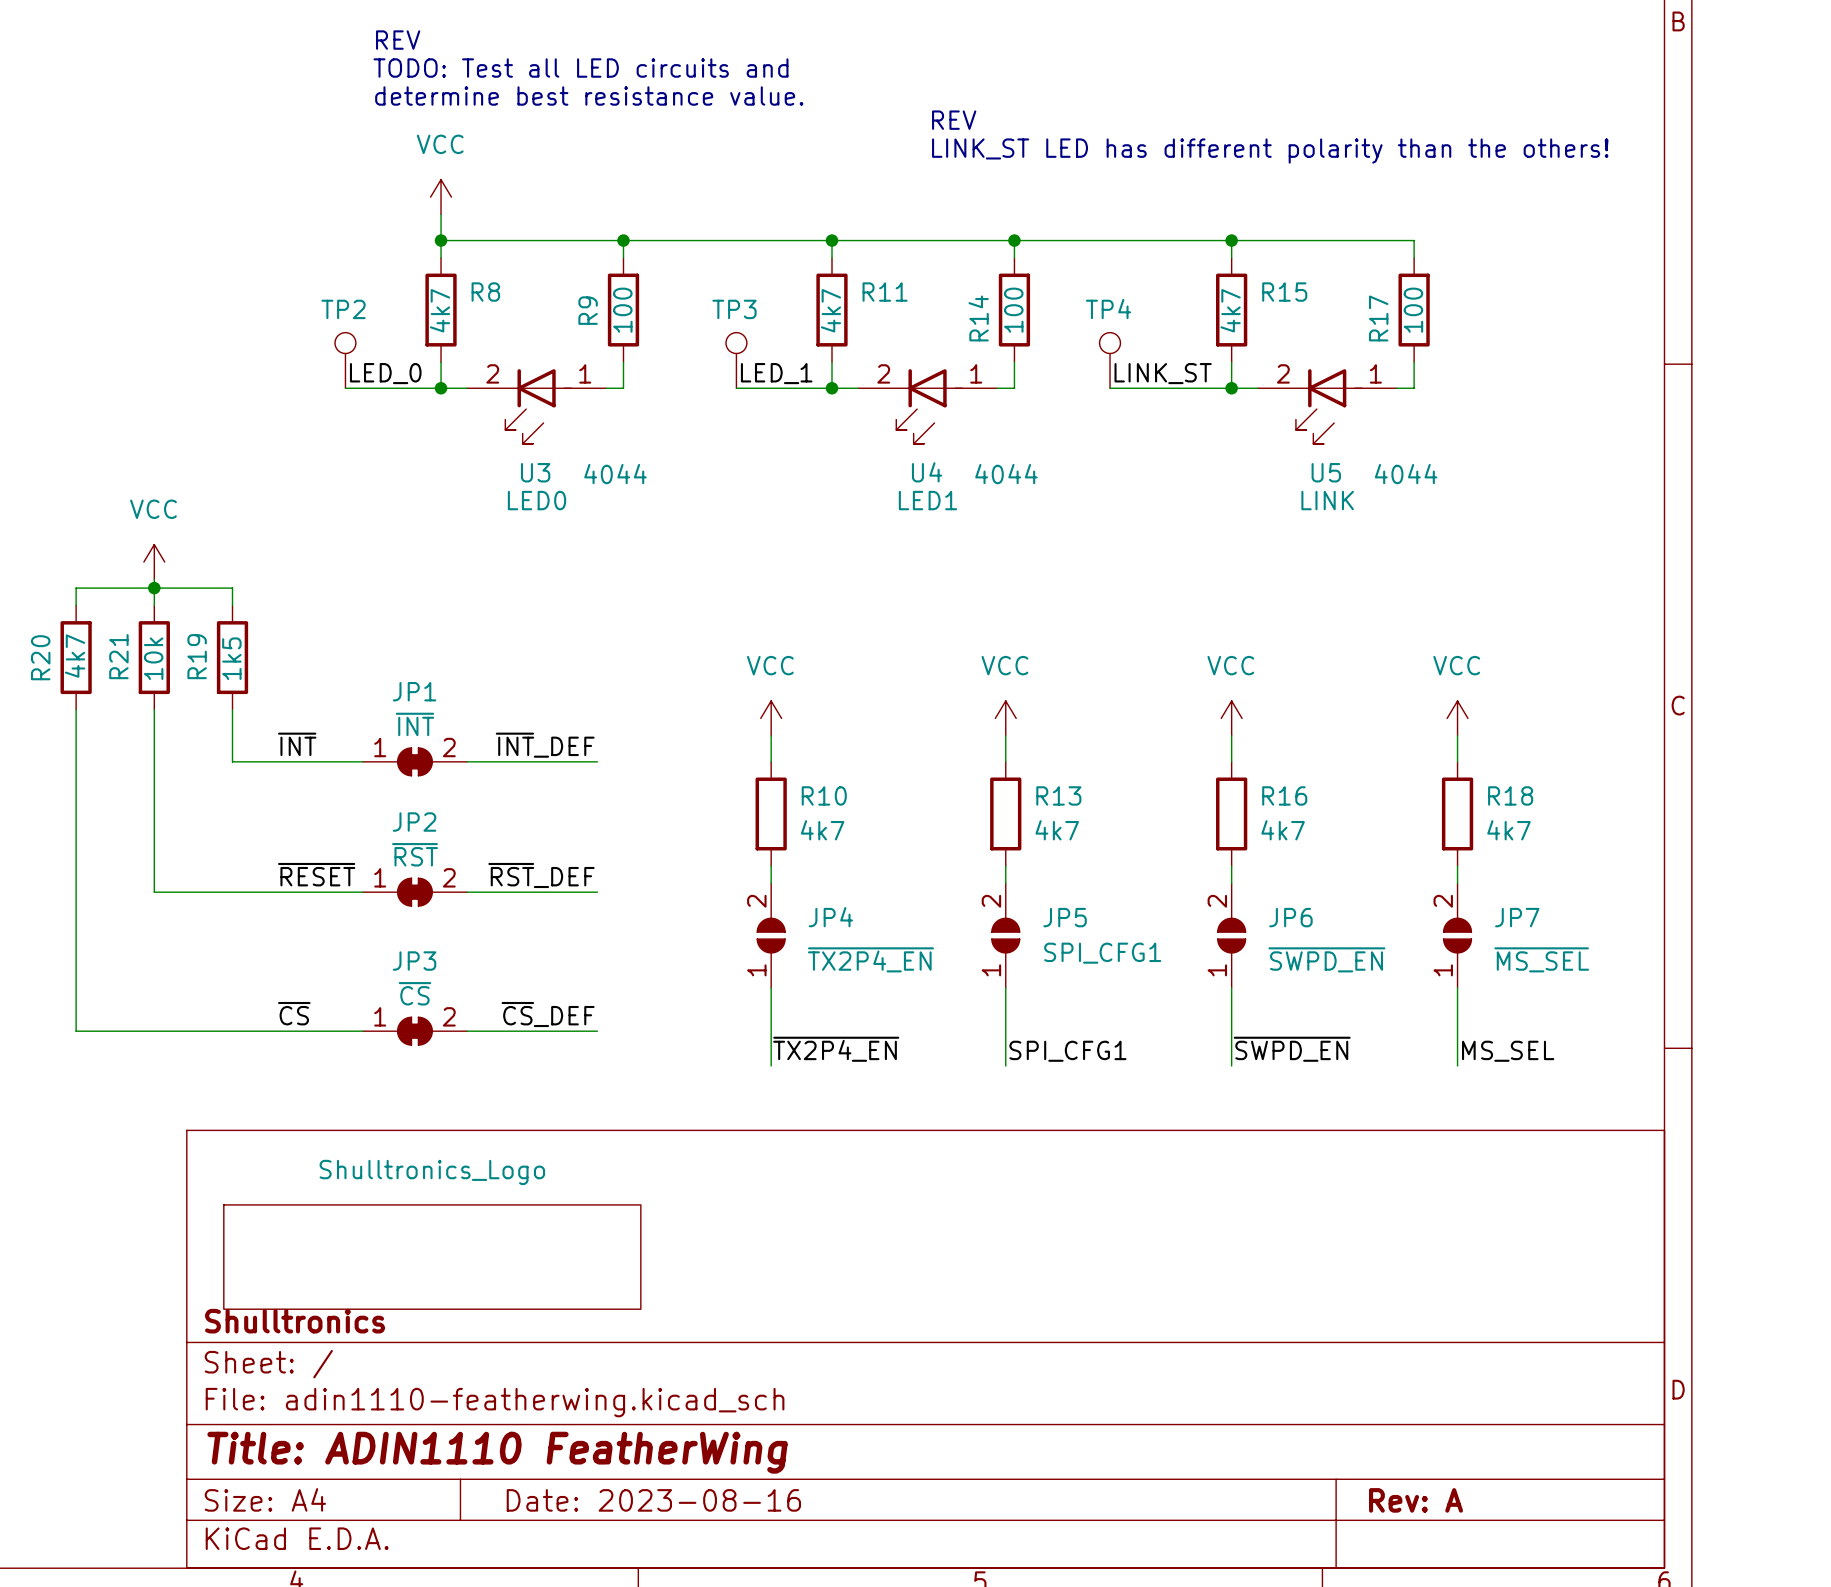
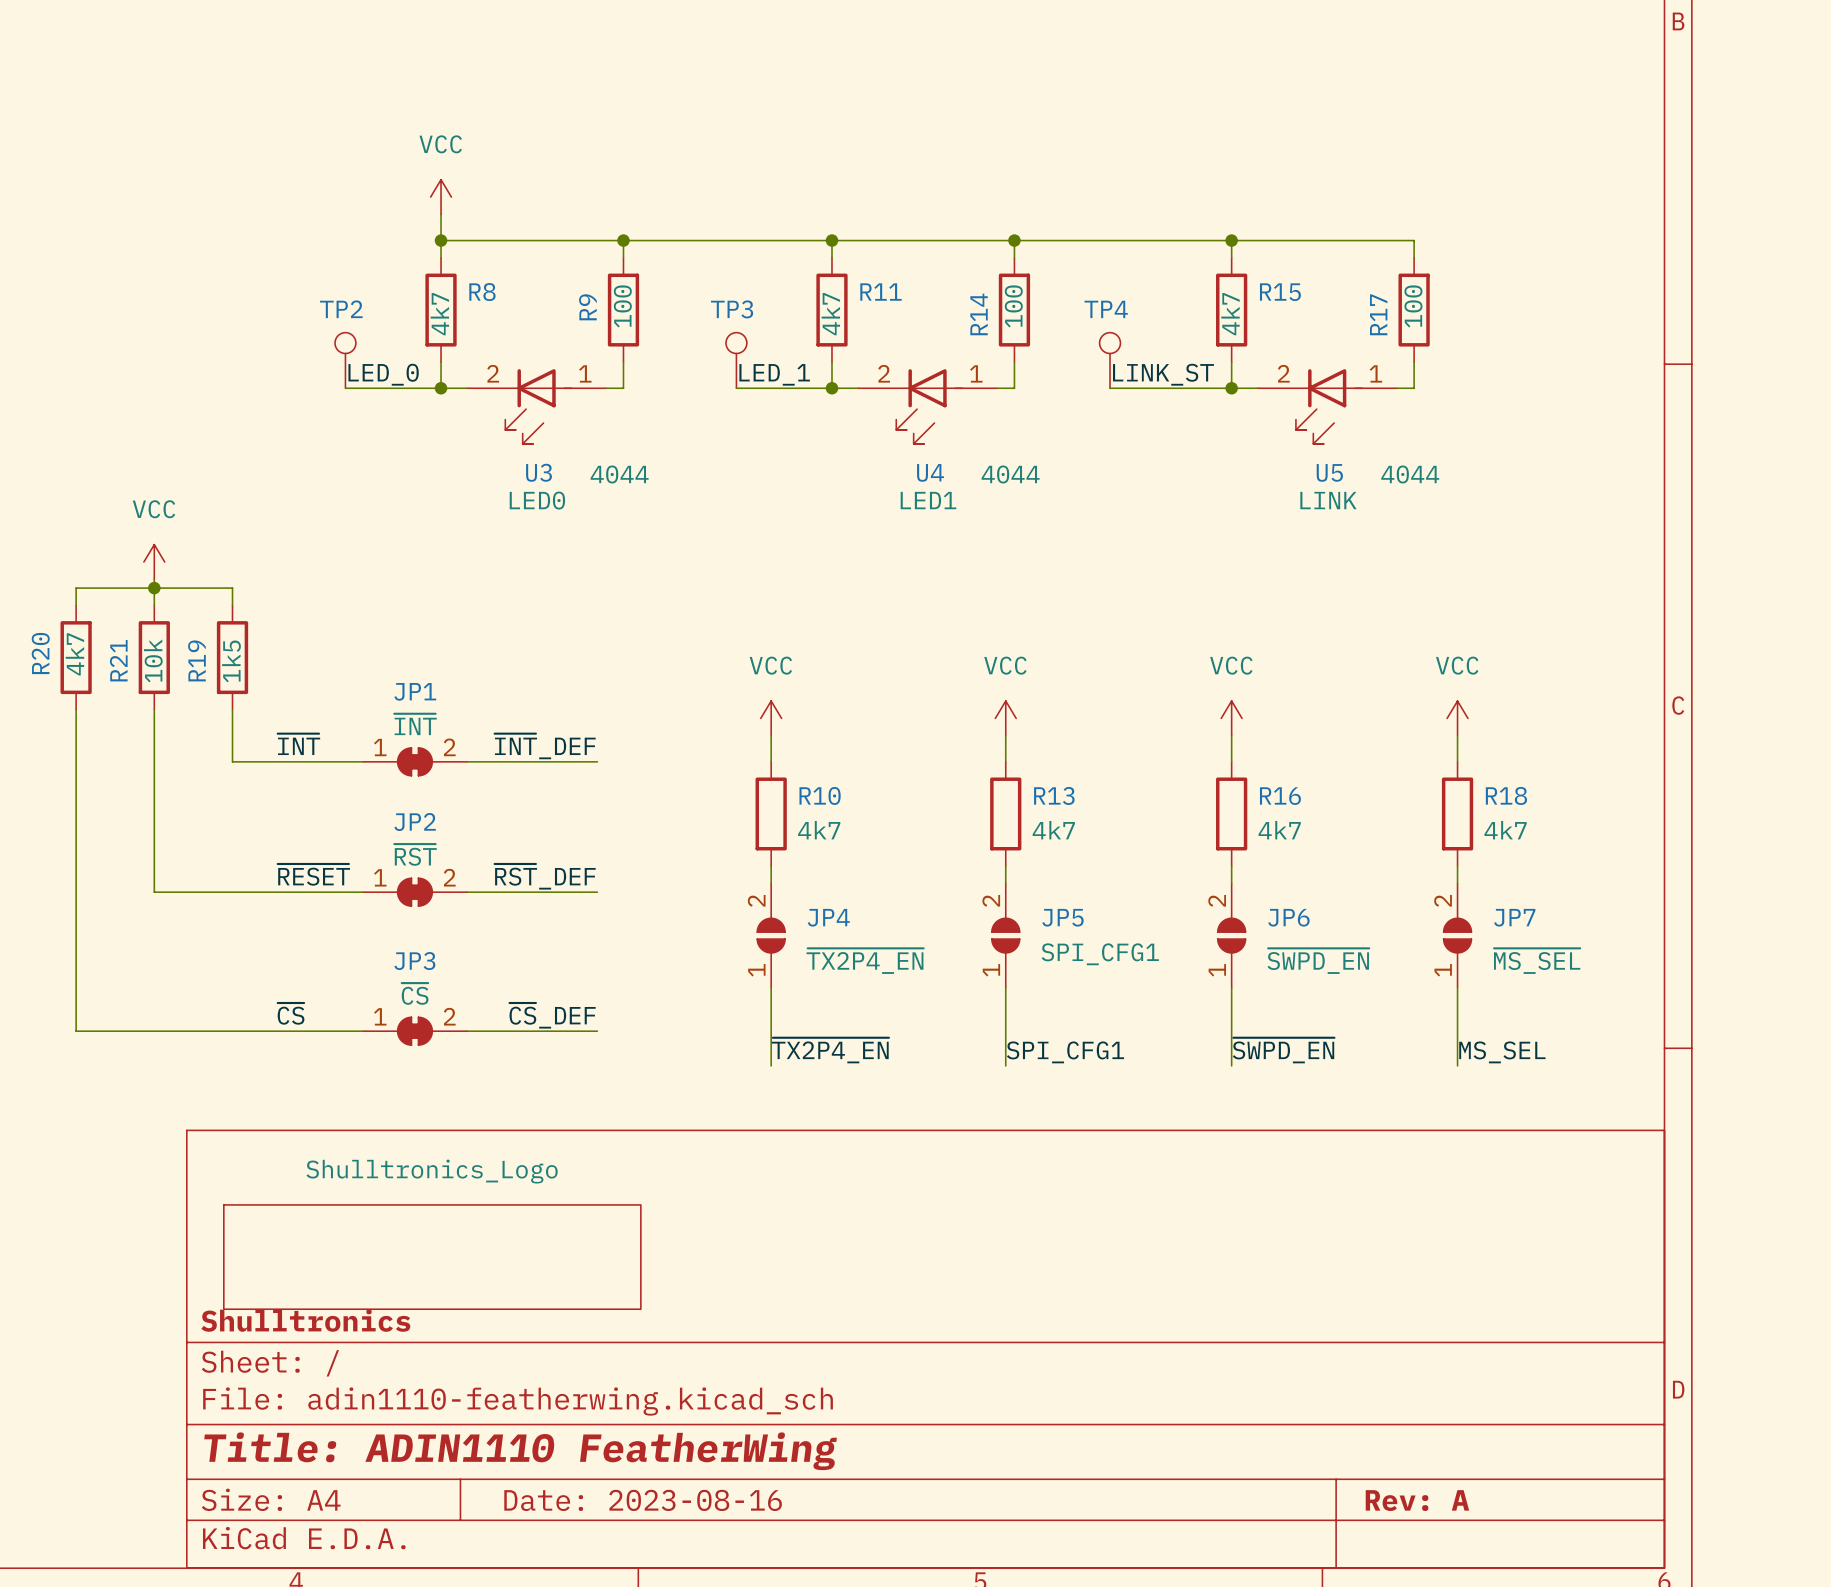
text: REV (398, 40) -> none
text: TODO: Test all LED circuits and (580, 68) -> none
text: determine best resistance value. (589, 96) -> none
text: REV (954, 120) -> none
text: LINK_ST LED has different polarity than the others! (1270, 151) -> none

